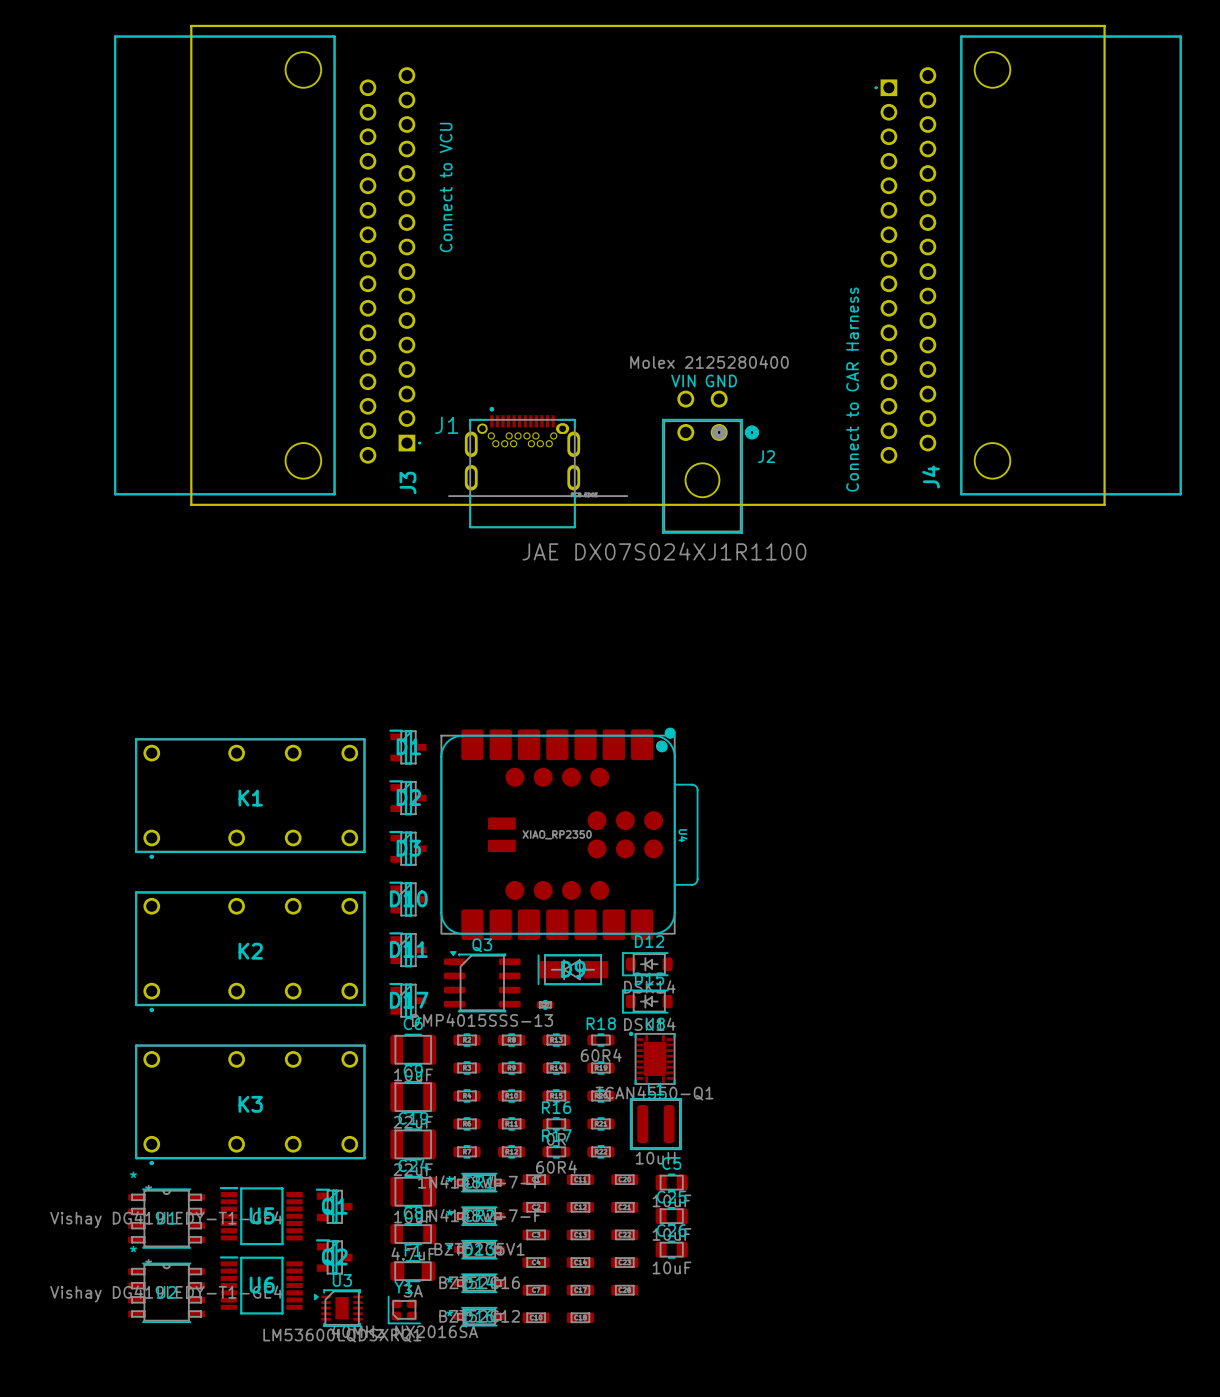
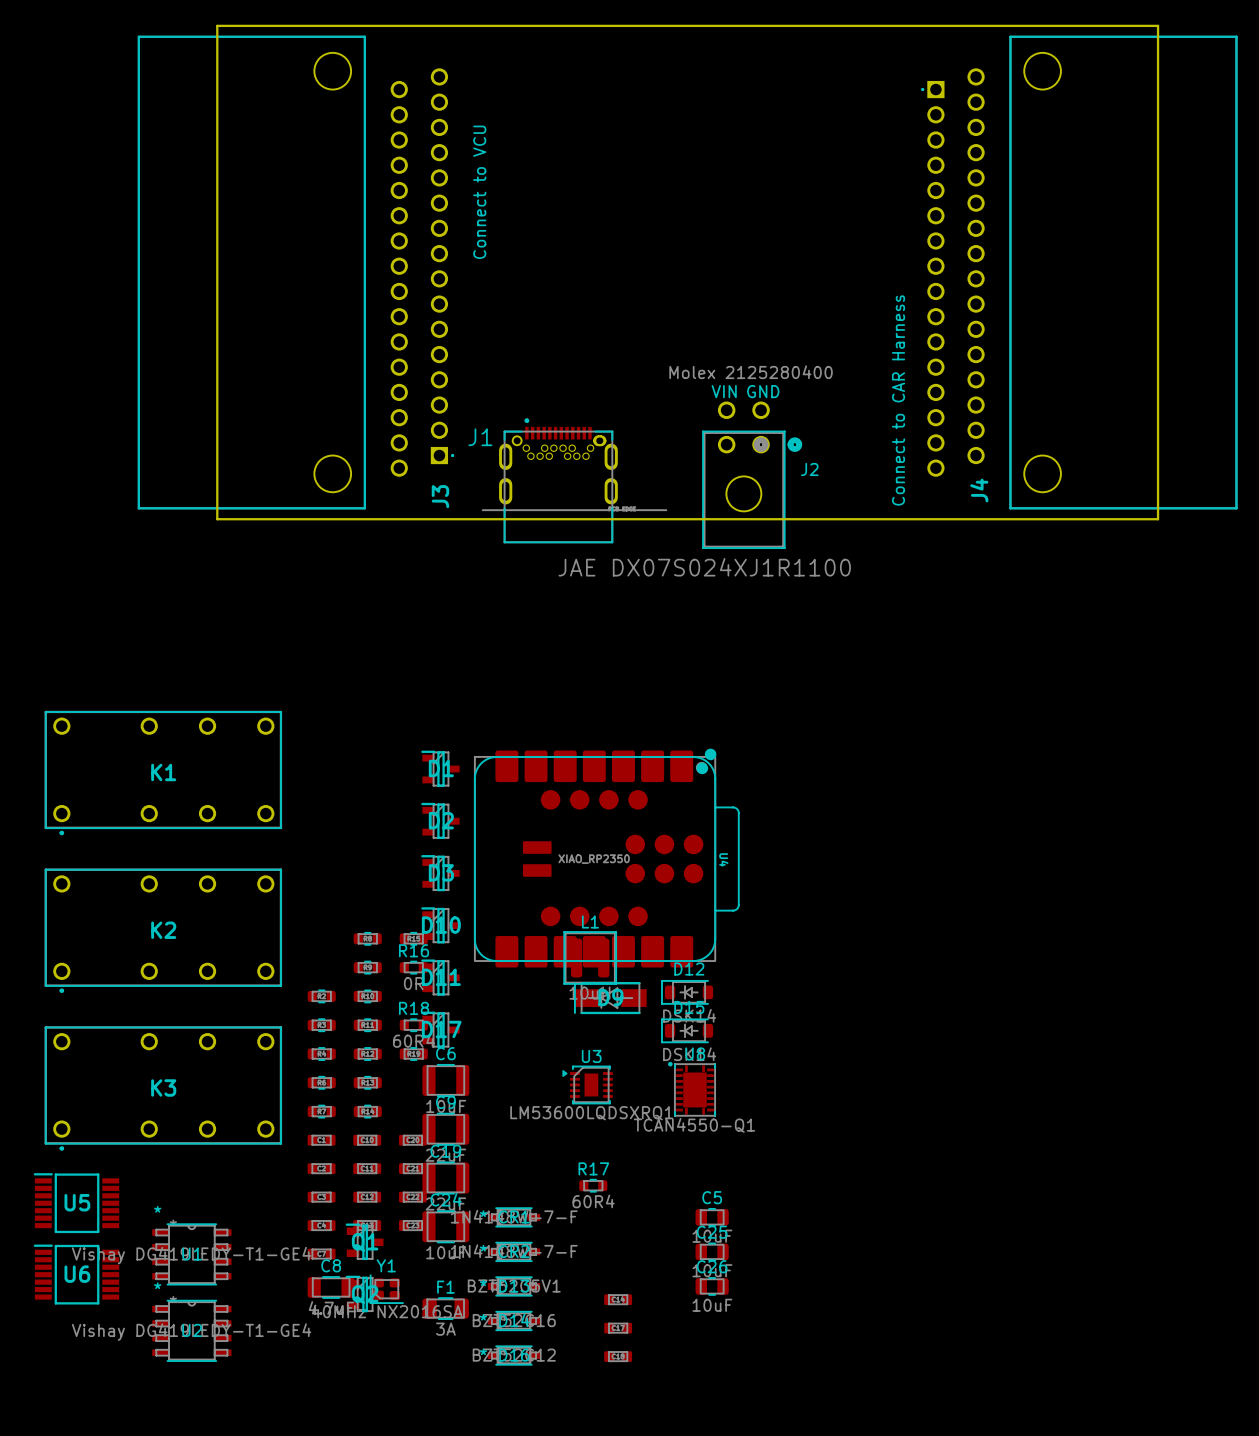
K1 position: (250, 798) -> (163, 773)
K2 position: (250, 951) -> (163, 930)
Q3: DMP4015SSS-13 (482, 981) -> none
part: (545, 1004) -> none
part position: (467, 1040) -> (321, 996)
part position: (511, 1040) -> (367, 938)
part position: (556, 1040) -> (367, 1082)
R18 position: (600, 1040) -> (413, 1025)
part position: (467, 1068) -> (321, 1025)
part position: (511, 1068) -> (367, 967)
part position: (556, 1068) -> (367, 1111)
part position: (600, 1068) -> (413, 1054)
part position: (467, 1095) -> (321, 1054)
part position: (511, 1095) -> (367, 996)
part position: (556, 1095) -> (413, 938)
part: (600, 1095) -> none
K3 position: (250, 1104) -> (163, 1088)
part position: (467, 1123) -> (321, 1082)
part position: (511, 1123) -> (367, 1025)
R16 position: (556, 1123) -> (413, 967)
part: (600, 1123) -> none
L1 position: (655, 1124) -> (590, 957)
part position: (467, 1151) -> (321, 1111)
part position: (511, 1151) -> (367, 1054)
part: (600, 1151) -> none
part position: (536, 1179) -> (321, 1140)
part position: (580, 1179) -> (367, 1168)
part position: (624, 1179) -> (412, 1140)
part position: (536, 1207) -> (321, 1168)
part position: (580, 1207) -> (367, 1197)
part position: (624, 1207) -> (412, 1168)
U5 position: (261, 1216) -> (76, 1203)
C8 position: (413, 1234) -> (331, 1287)
part position: (536, 1234) -> (321, 1197)
part position: (580, 1234) -> (367, 1225)
part position: (624, 1234) -> (412, 1197)
part position: (536, 1262) -> (321, 1225)
part position: (624, 1262) -> (412, 1225)
U6 position: (261, 1285) -> (76, 1274)
part position: (536, 1290) -> (321, 1254)
part: (624, 1290) -> none
U3 position: (338, 1308) -> (587, 1084)
Y1 position: (404, 1309) -> (386, 1289)
part position: (536, 1317) -> (367, 1140)

